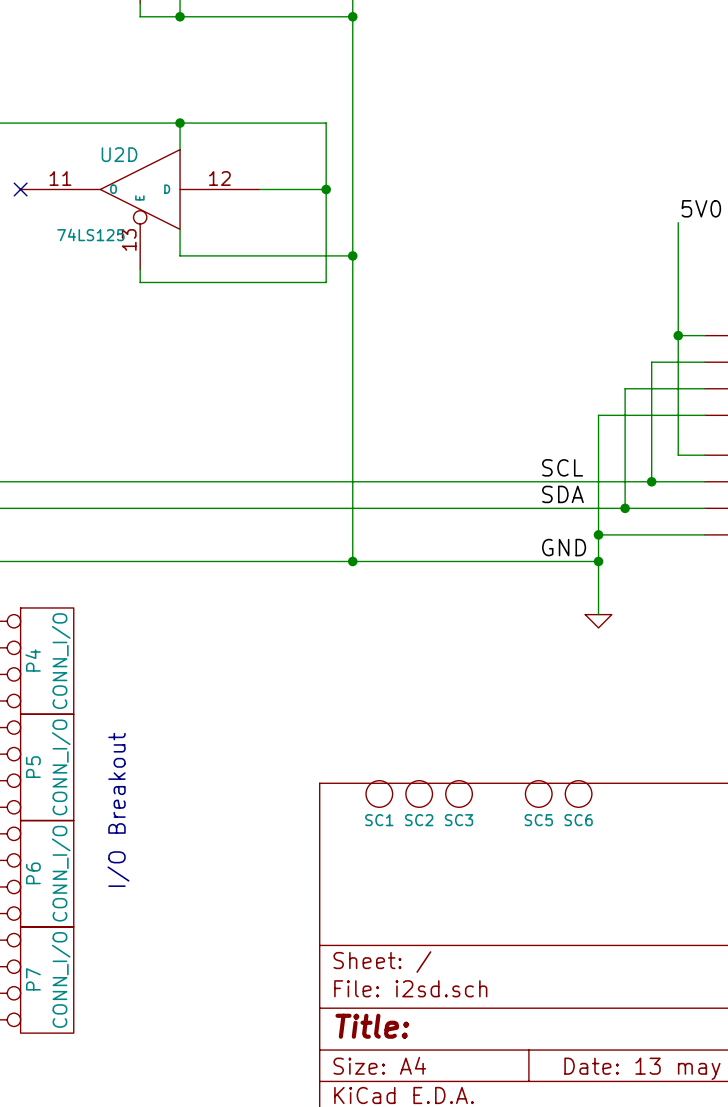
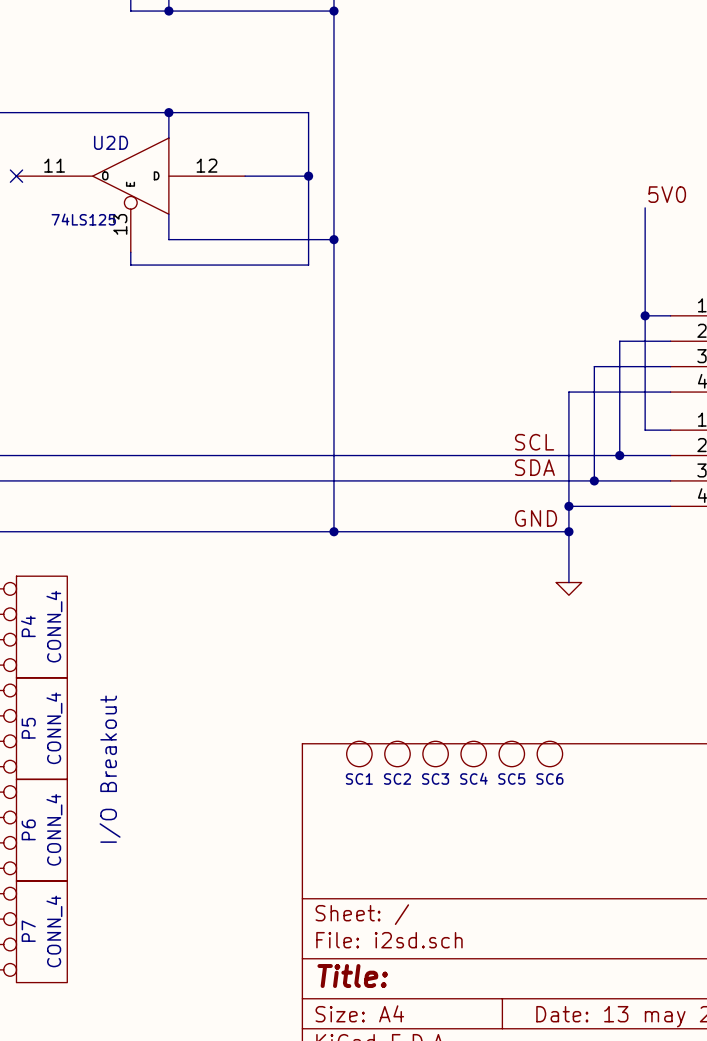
P4 value: CONN_I/O (61, 661) -> CONN_4 (54, 626)
P5 value: CONN_I/O (61, 767) -> CONN_4 (54, 728)
SC4: none -> (473, 753)
P6 value: CONN_I/O (61, 873) -> CONN_4 (54, 829)
P7 value: CONN_I/O (61, 979) -> CONN_4 (54, 931)

